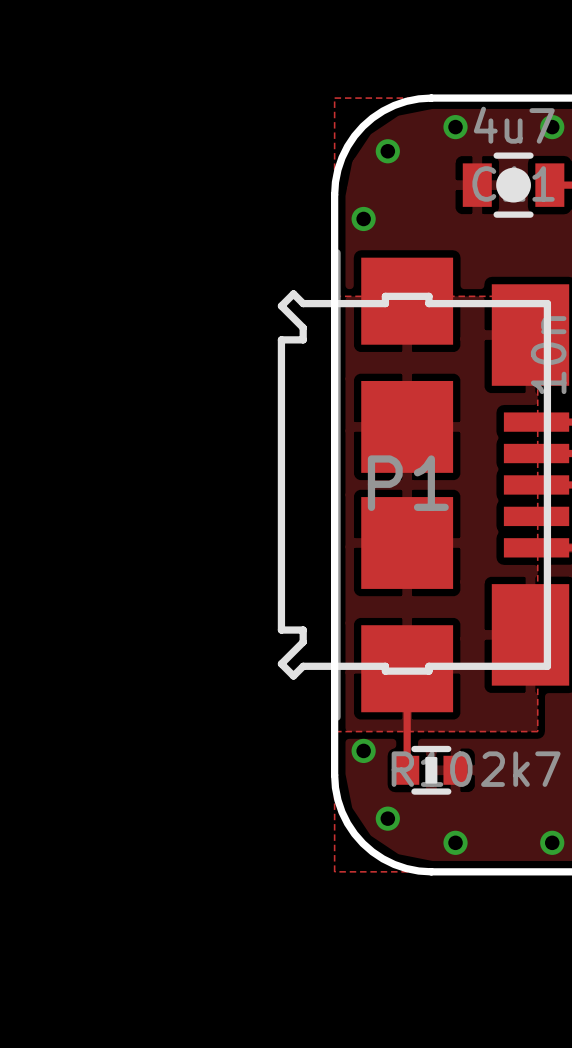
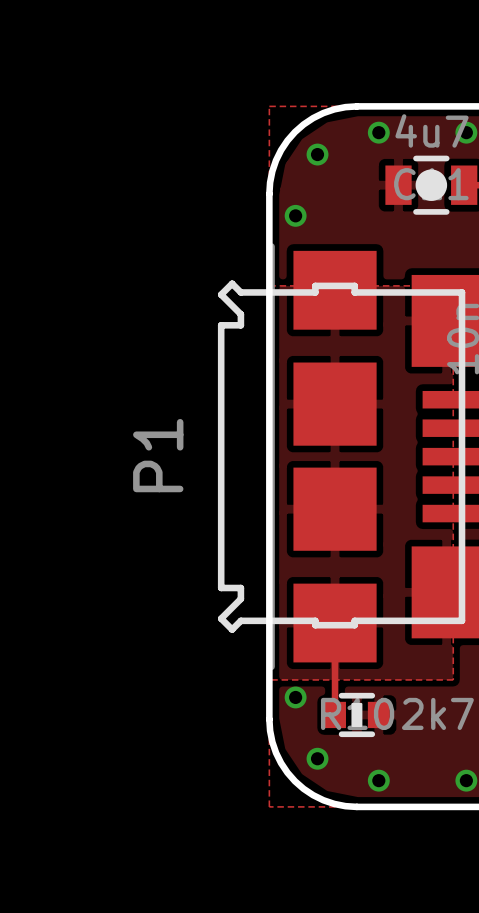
P1 name rotation: 0° (408, 483) -> 90° counterclockwise (158, 455)
P1 name position: P1 (408, 483) -> P1 (158, 455)

